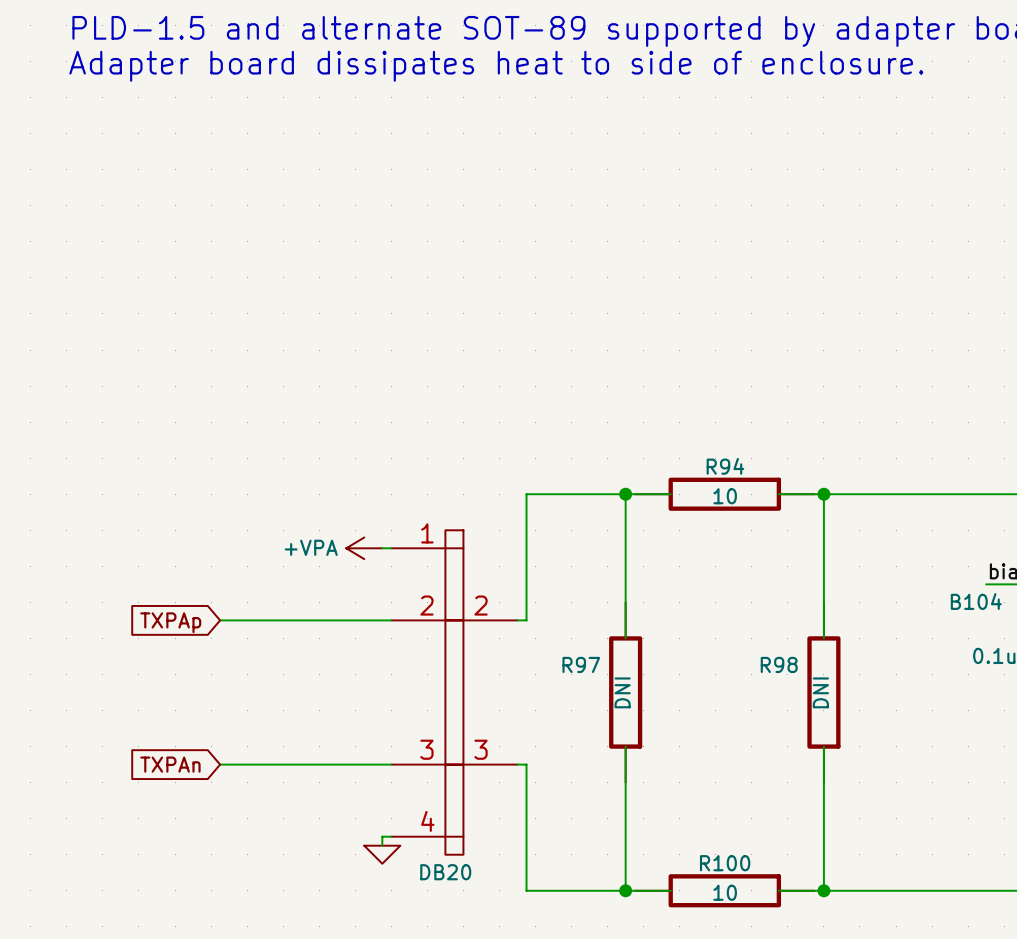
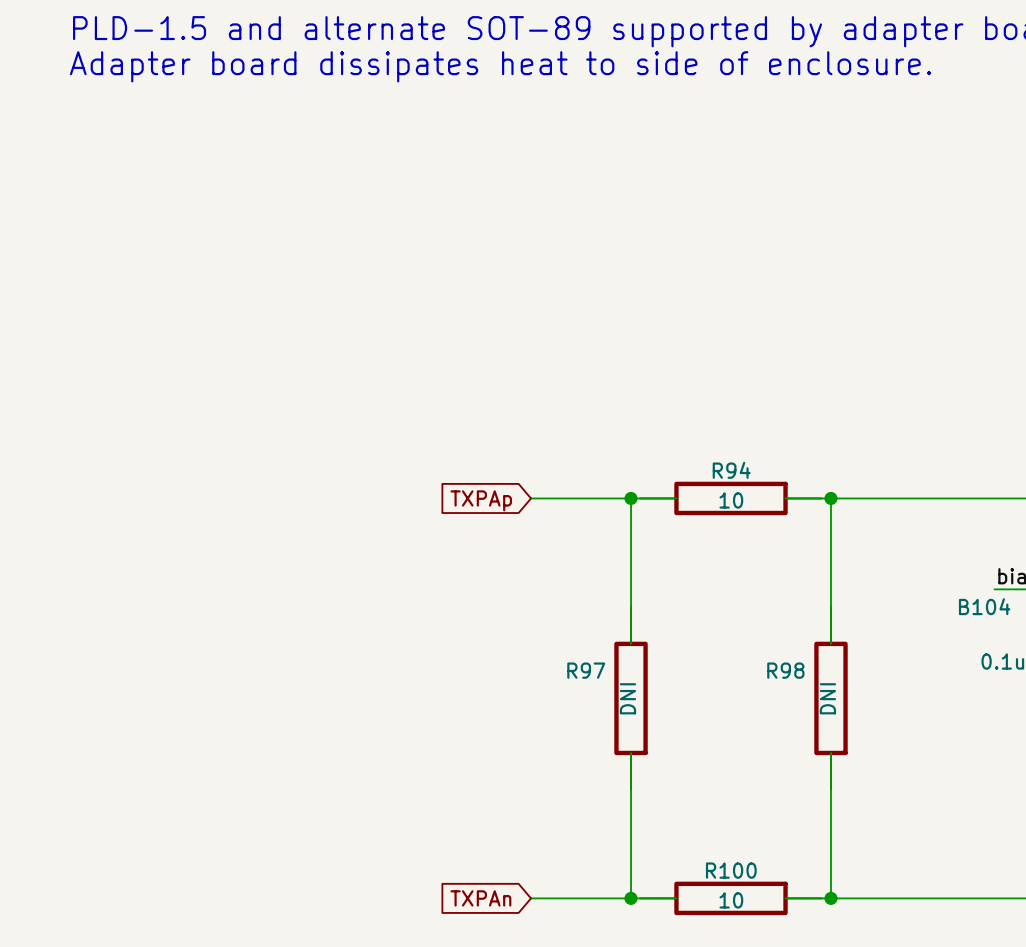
wire: (526, 494) (526, 620) (517, 620) -> none
power symbol: +VPA (364, 548) -> none
wire: (382, 548) (391, 548) -> none
wire: (220, 620) (391, 620) -> none
global label position: TXPAp (170, 622) -> TXPAp (481, 500)
DB20: (454, 692) -> none
global label position: TXPAn (170, 764) -> TXPAn (480, 898)
wire: (220, 764) (391, 764) -> none
wire: (517, 764) (526, 764) (526, 890) -> none
wire: (391, 836) (382, 836) (382, 845) -> none
power symbol: (382, 854) -> none

